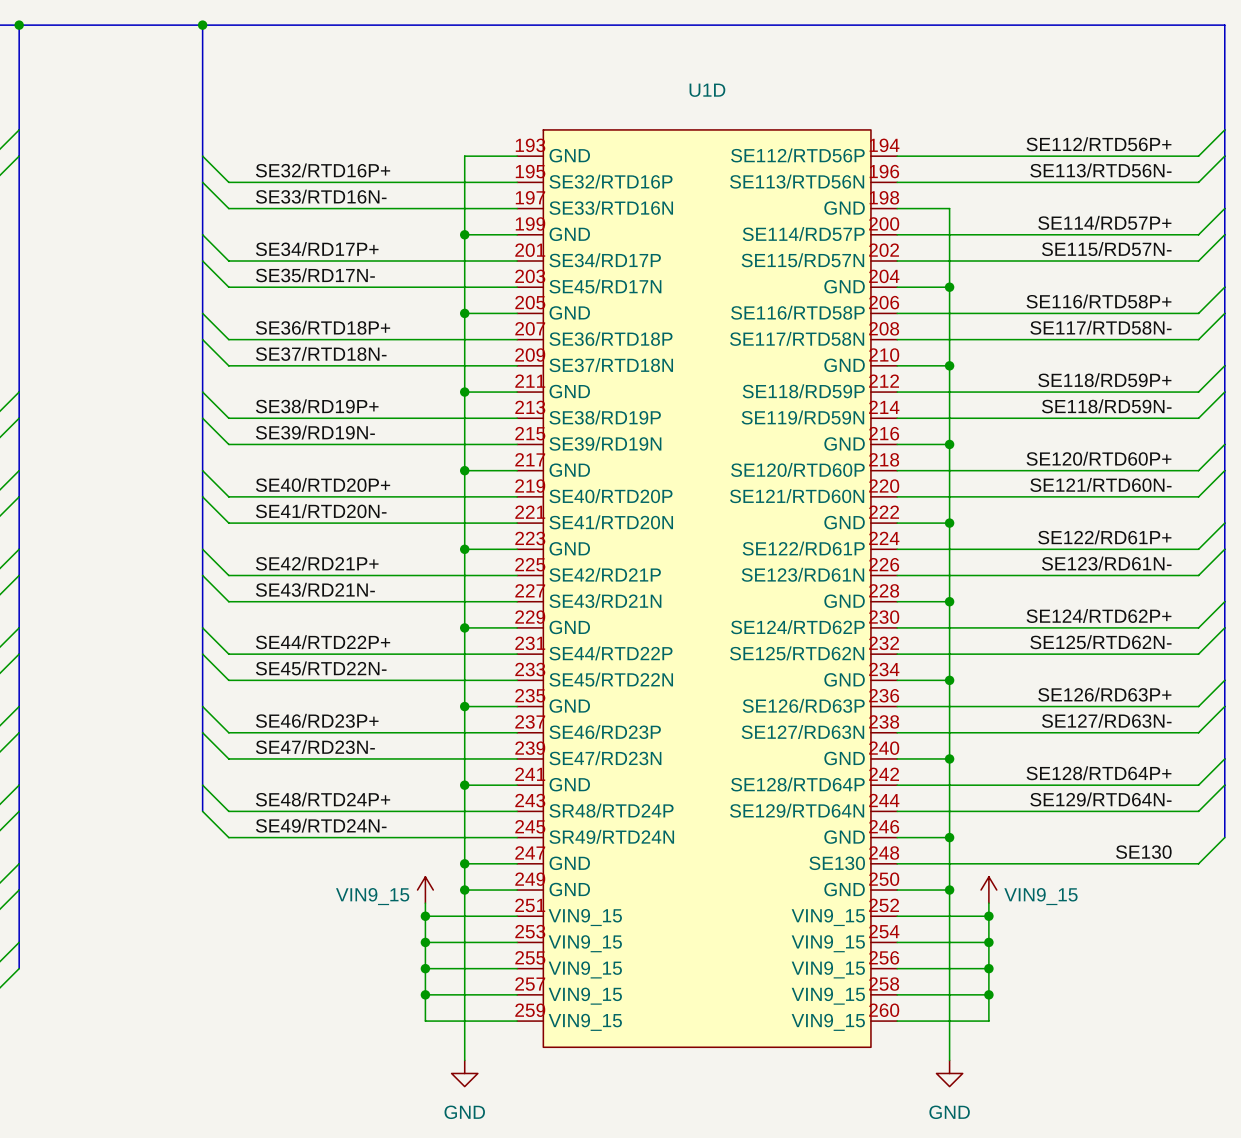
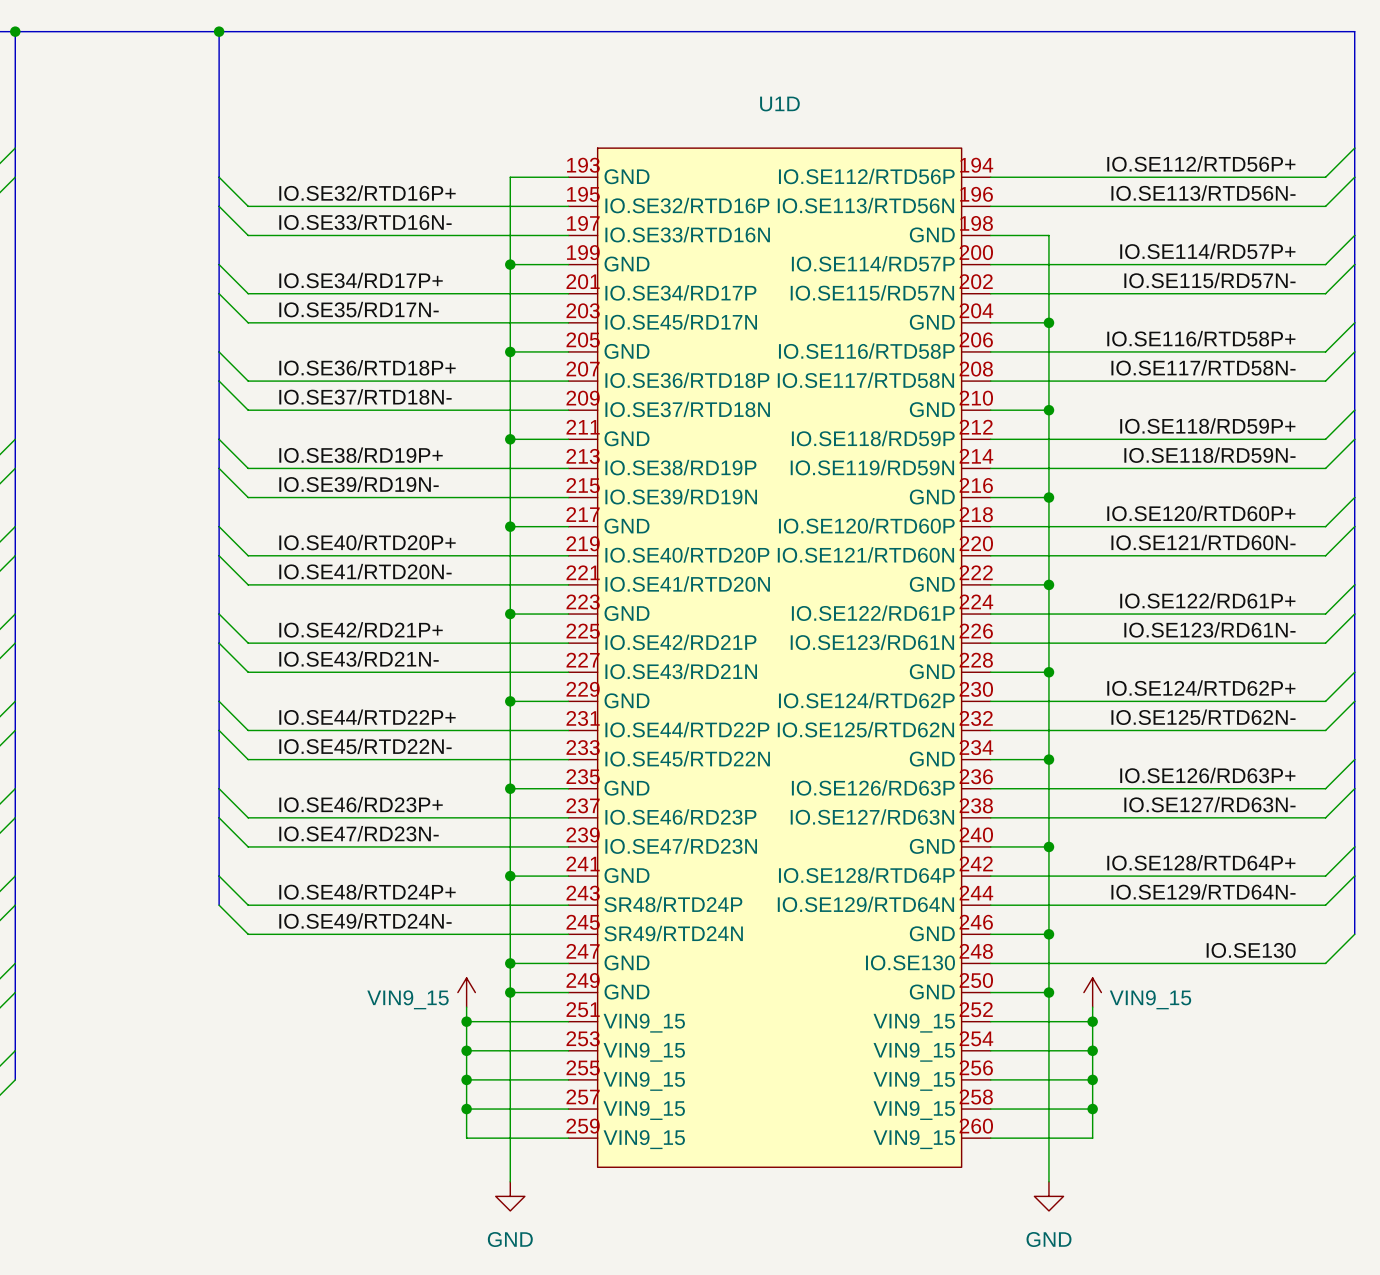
U1D symbol: [517, 129, 898, 1048] -> [568, 148, 991, 1168]
label: SE112/RTD56P+ (1099, 144) -> IO.SE112/RTD56P+ (1201, 163)
label: SE32/RTD16P+ (323, 170) -> IO.SE32/RTD16P+ (367, 193)
label: SE113/RTD56N- (1100, 170) -> IO.SE113/RTD56N- (1203, 193)
label: SE33/RTD16N- (321, 196) -> IO.SE33/RTD16N- (365, 222)
label: SE114/RD57P+ (1104, 222) -> IO.SE114/RD57P+ (1207, 251)
label: SE34/RD17P+ (317, 249) -> IO.SE34/RD17P+ (361, 280)
label: SE115/RD57N- (1106, 249) -> IO.SE115/RD57N- (1209, 280)
label: SE35/RD17N- (315, 275) -> IO.SE35/RD17N- (359, 309)
label: SE116/RTD58P+ (1099, 301) -> IO.SE116/RTD58P+ (1201, 338)
label: SE36/RTD18P+ (323, 327) -> IO.SE36/RTD18P+ (367, 367)
label: SE117/RTD58N- (1100, 327) -> IO.SE117/RTD58N- (1203, 367)
label: SE37/RTD18N- (321, 353) -> IO.SE37/RTD18N- (365, 396)
label: SE118/RD59P+ (1104, 380) -> IO.SE118/RD59P+ (1207, 426)
label: SE38/RD19P+ (317, 406) -> IO.SE38/RD19P+ (361, 455)
label: SE118/RD59N- (1106, 406) -> IO.SE118/RD59N- (1209, 455)
label: SE39/RD19N- (315, 432) -> IO.SE39/RD19N- (359, 484)
label: SE120/RTD60P+ (1099, 458) -> IO.SE120/RTD60P+ (1201, 513)
label: SE40/RTD20P+ (323, 484) -> IO.SE40/RTD20P+ (367, 542)
label: SE121/RTD60N- (1100, 484) -> IO.SE121/RTD60N- (1203, 542)
label: SE41/RTD20N- (321, 511) -> IO.SE41/RTD20N- (365, 571)
label: SE122/RD61P+ (1104, 537) -> IO.SE122/RD61P+ (1207, 600)
label: SE42/RD21P+ (317, 563) -> IO.SE42/RD21P+ (361, 629)
label: SE123/RD61N- (1106, 563) -> IO.SE123/RD61N- (1209, 629)
label: SE43/RD21N- (315, 589) -> IO.SE43/RD21N- (359, 658)
label: SE124/RTD62P+ (1099, 615) -> IO.SE124/RTD62P+ (1201, 688)
label: SE44/RTD22P+ (323, 642) -> IO.SE44/RTD22P+ (367, 717)
label: SE125/RTD62N- (1100, 642) -> IO.SE125/RTD62N- (1203, 717)
label: SE45/RTD22N- (321, 668) -> IO.SE45/RTD22N- (365, 746)
label: SE126/RD63P+ (1104, 694) -> IO.SE126/RD63P+ (1207, 775)
label: SE46/RD23P+ (317, 720) -> IO.SE46/RD23P+ (361, 804)
label: SE127/RD63N- (1106, 720) -> IO.SE127/RD63N- (1209, 804)
label: SE47/RD23N- (315, 747) -> IO.SE47/RD23N- (359, 833)
label: SE128/RTD64P+ (1099, 773) -> IO.SE128/RTD64P+ (1201, 862)
label: SE48/RTD24P+ (323, 799) -> IO.SE48/RTD24P+ (367, 891)
label: SE129/RTD64N- (1100, 799) -> IO.SE129/RTD64N- (1203, 891)
label: SE49/RTD24N- (321, 825) -> IO.SE49/RTD24N- (365, 921)
label: SE130 (1143, 852) -> IO.SE130 (1251, 950)

